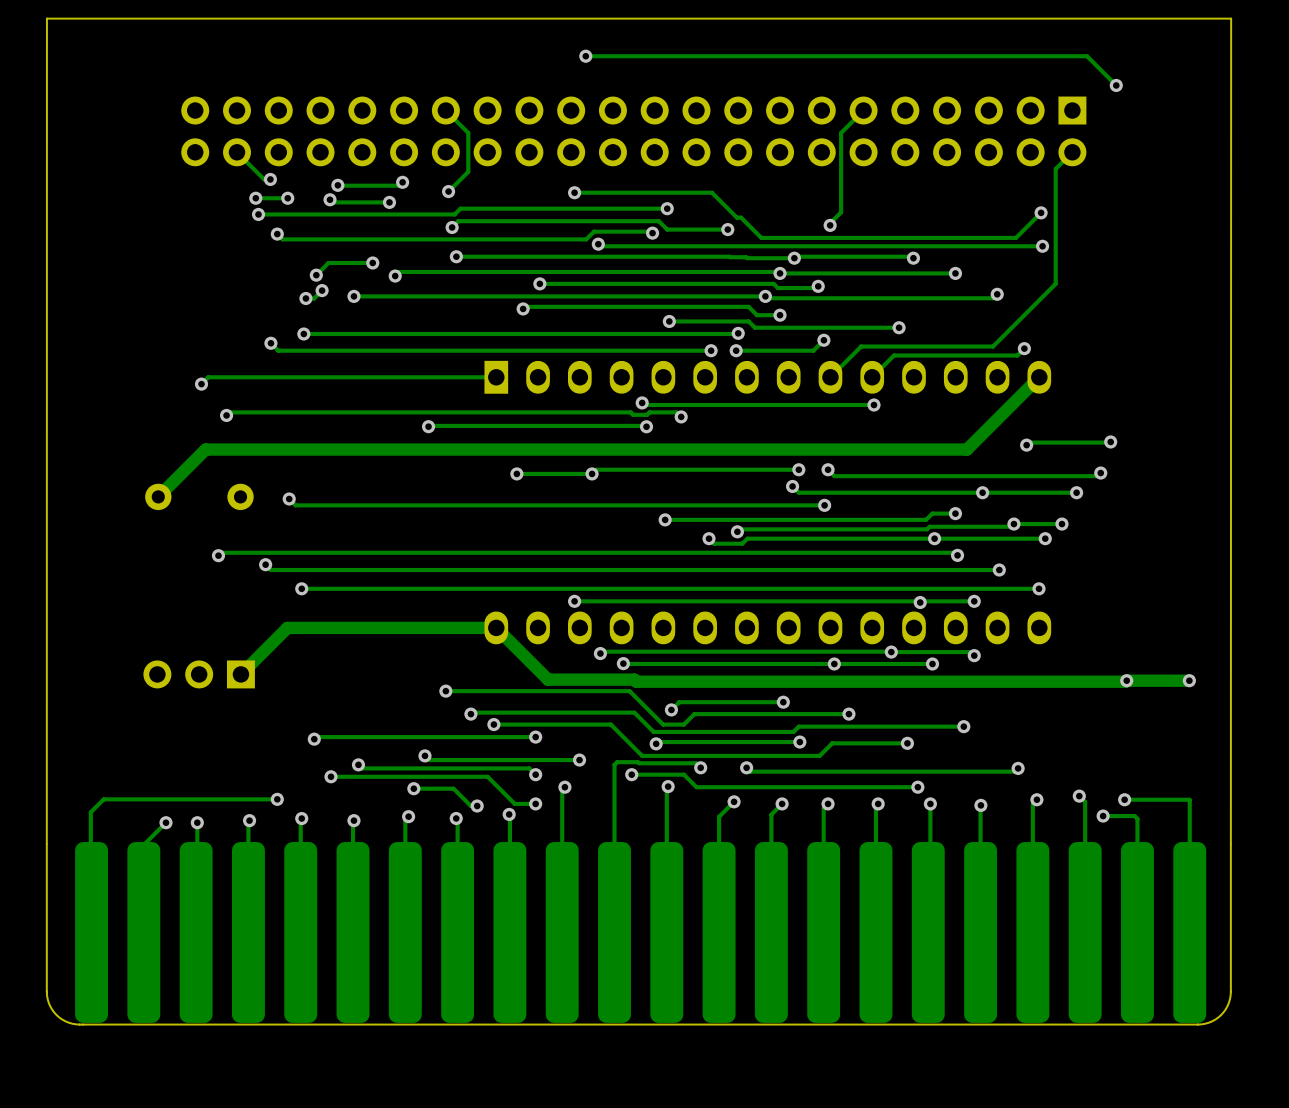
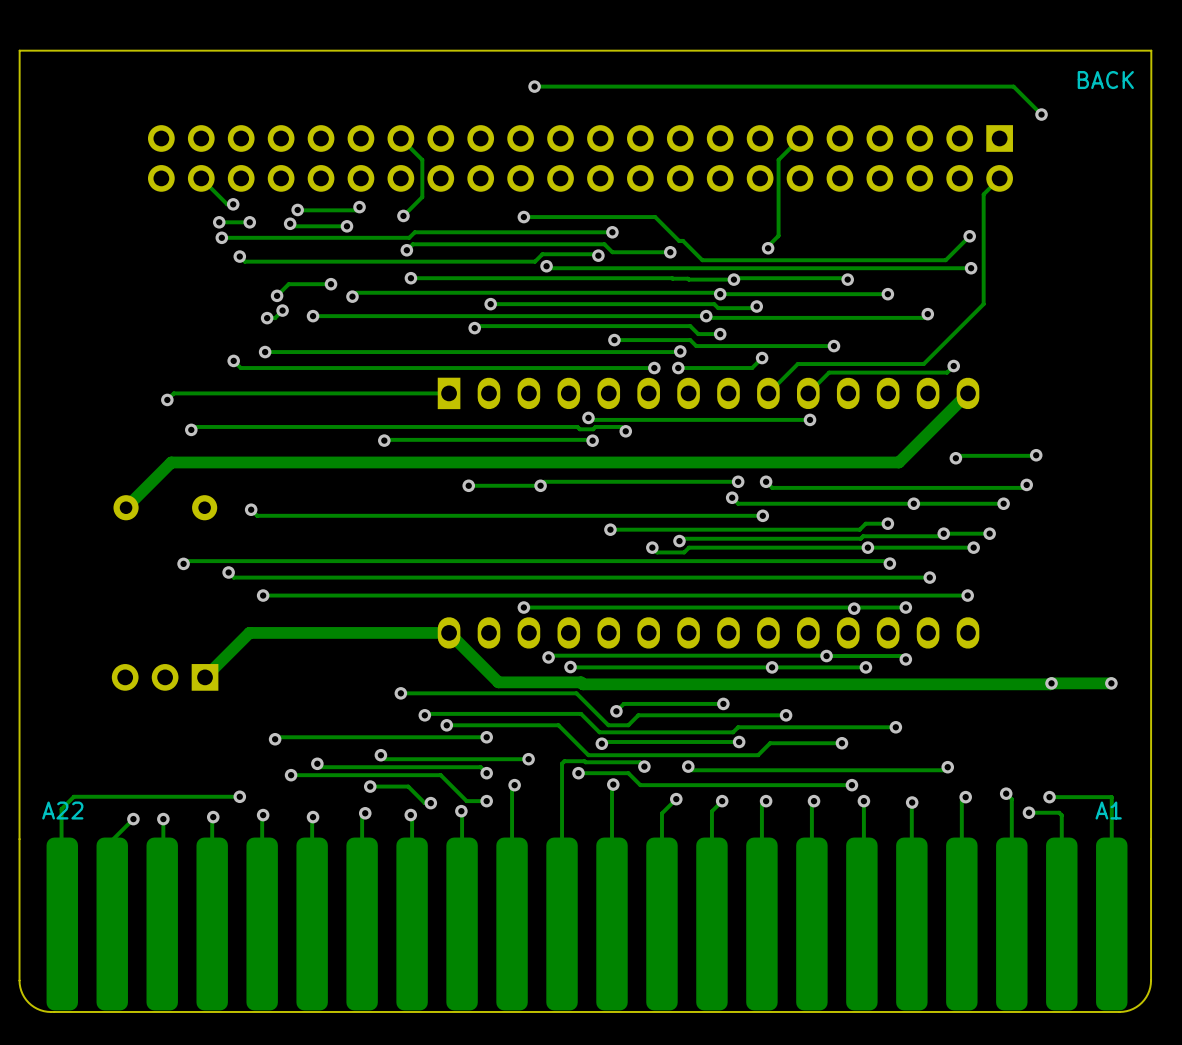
text: none -> BACK (1105, 80)
text: none -> A22 (62, 810)
text: none -> A1 (1108, 810)

